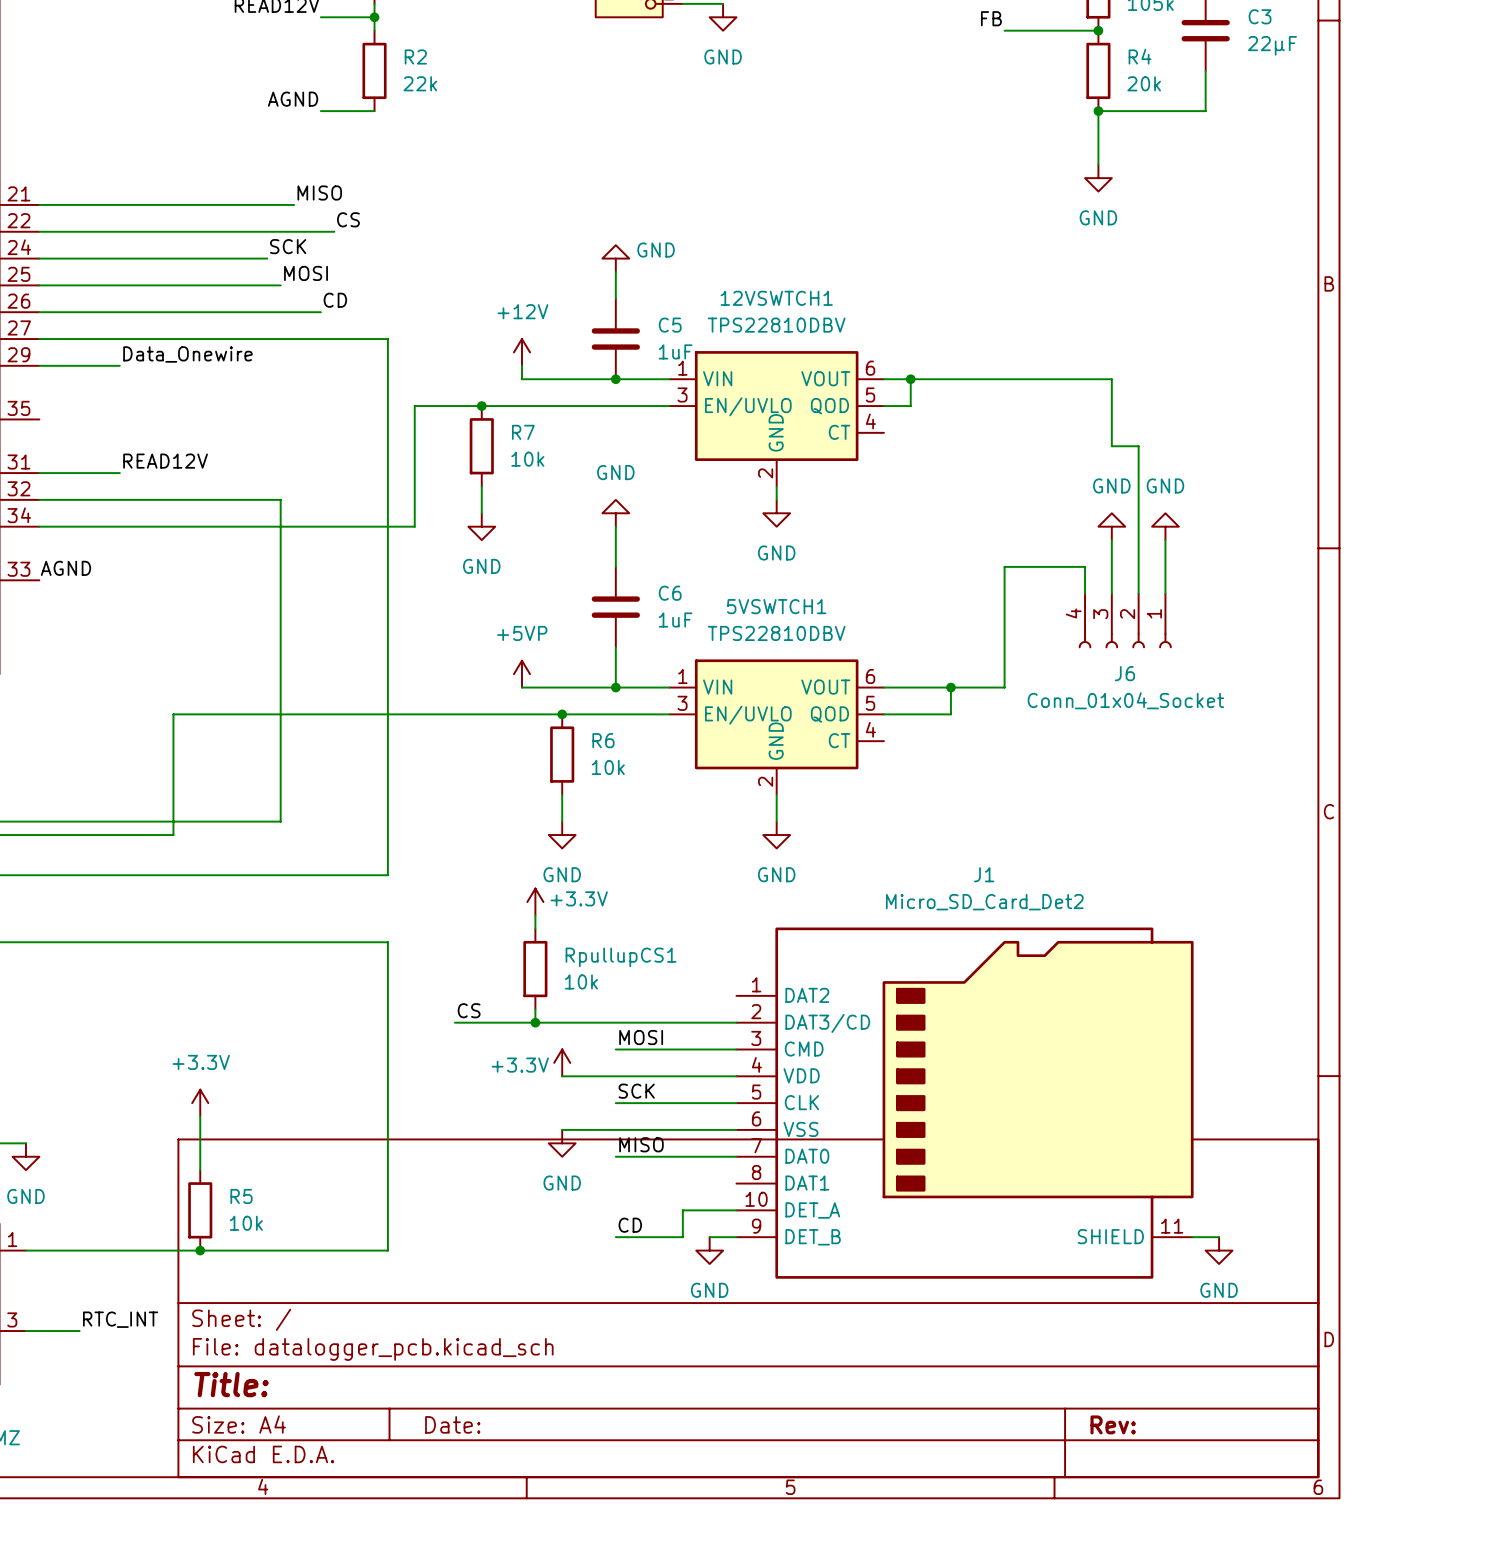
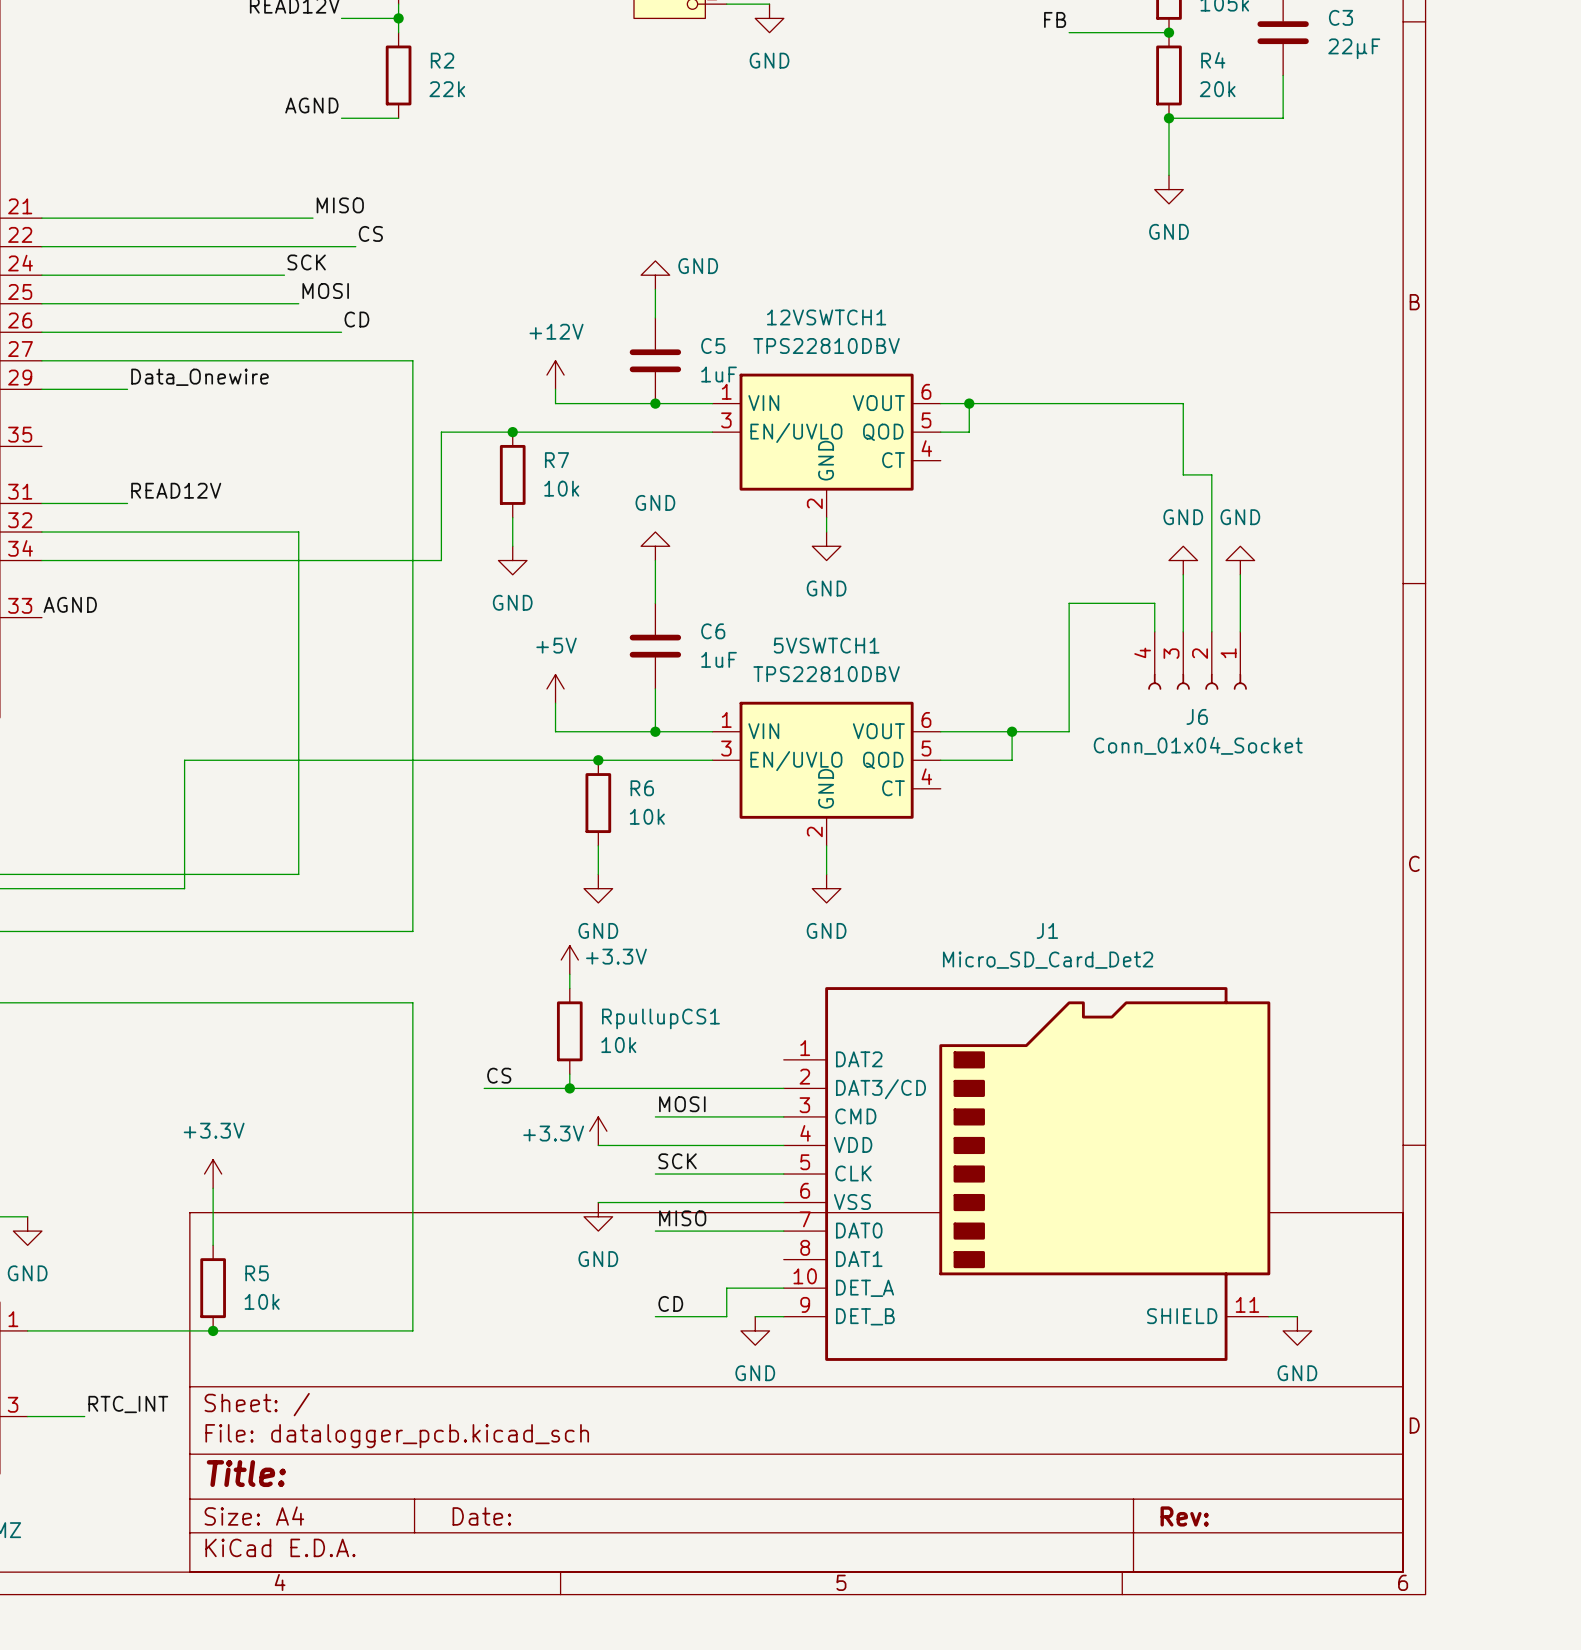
power symbol: none -> +5V (555, 688)
power symbol: +5VP (521, 674) -> none

